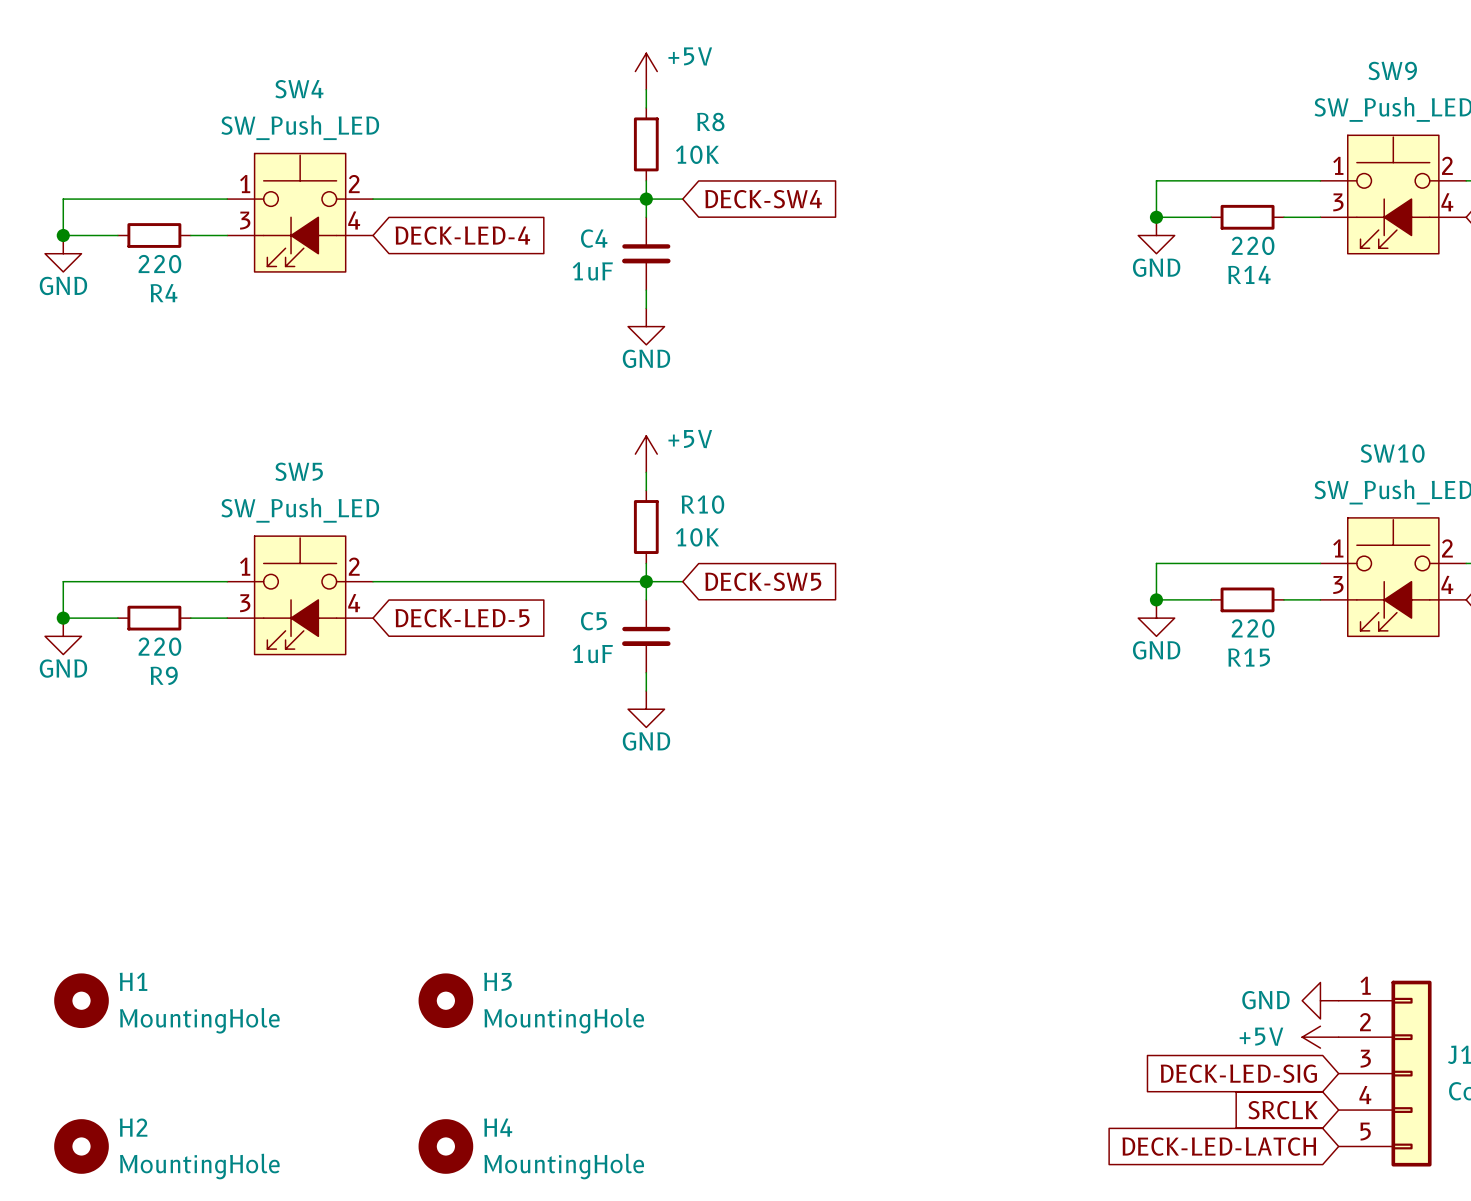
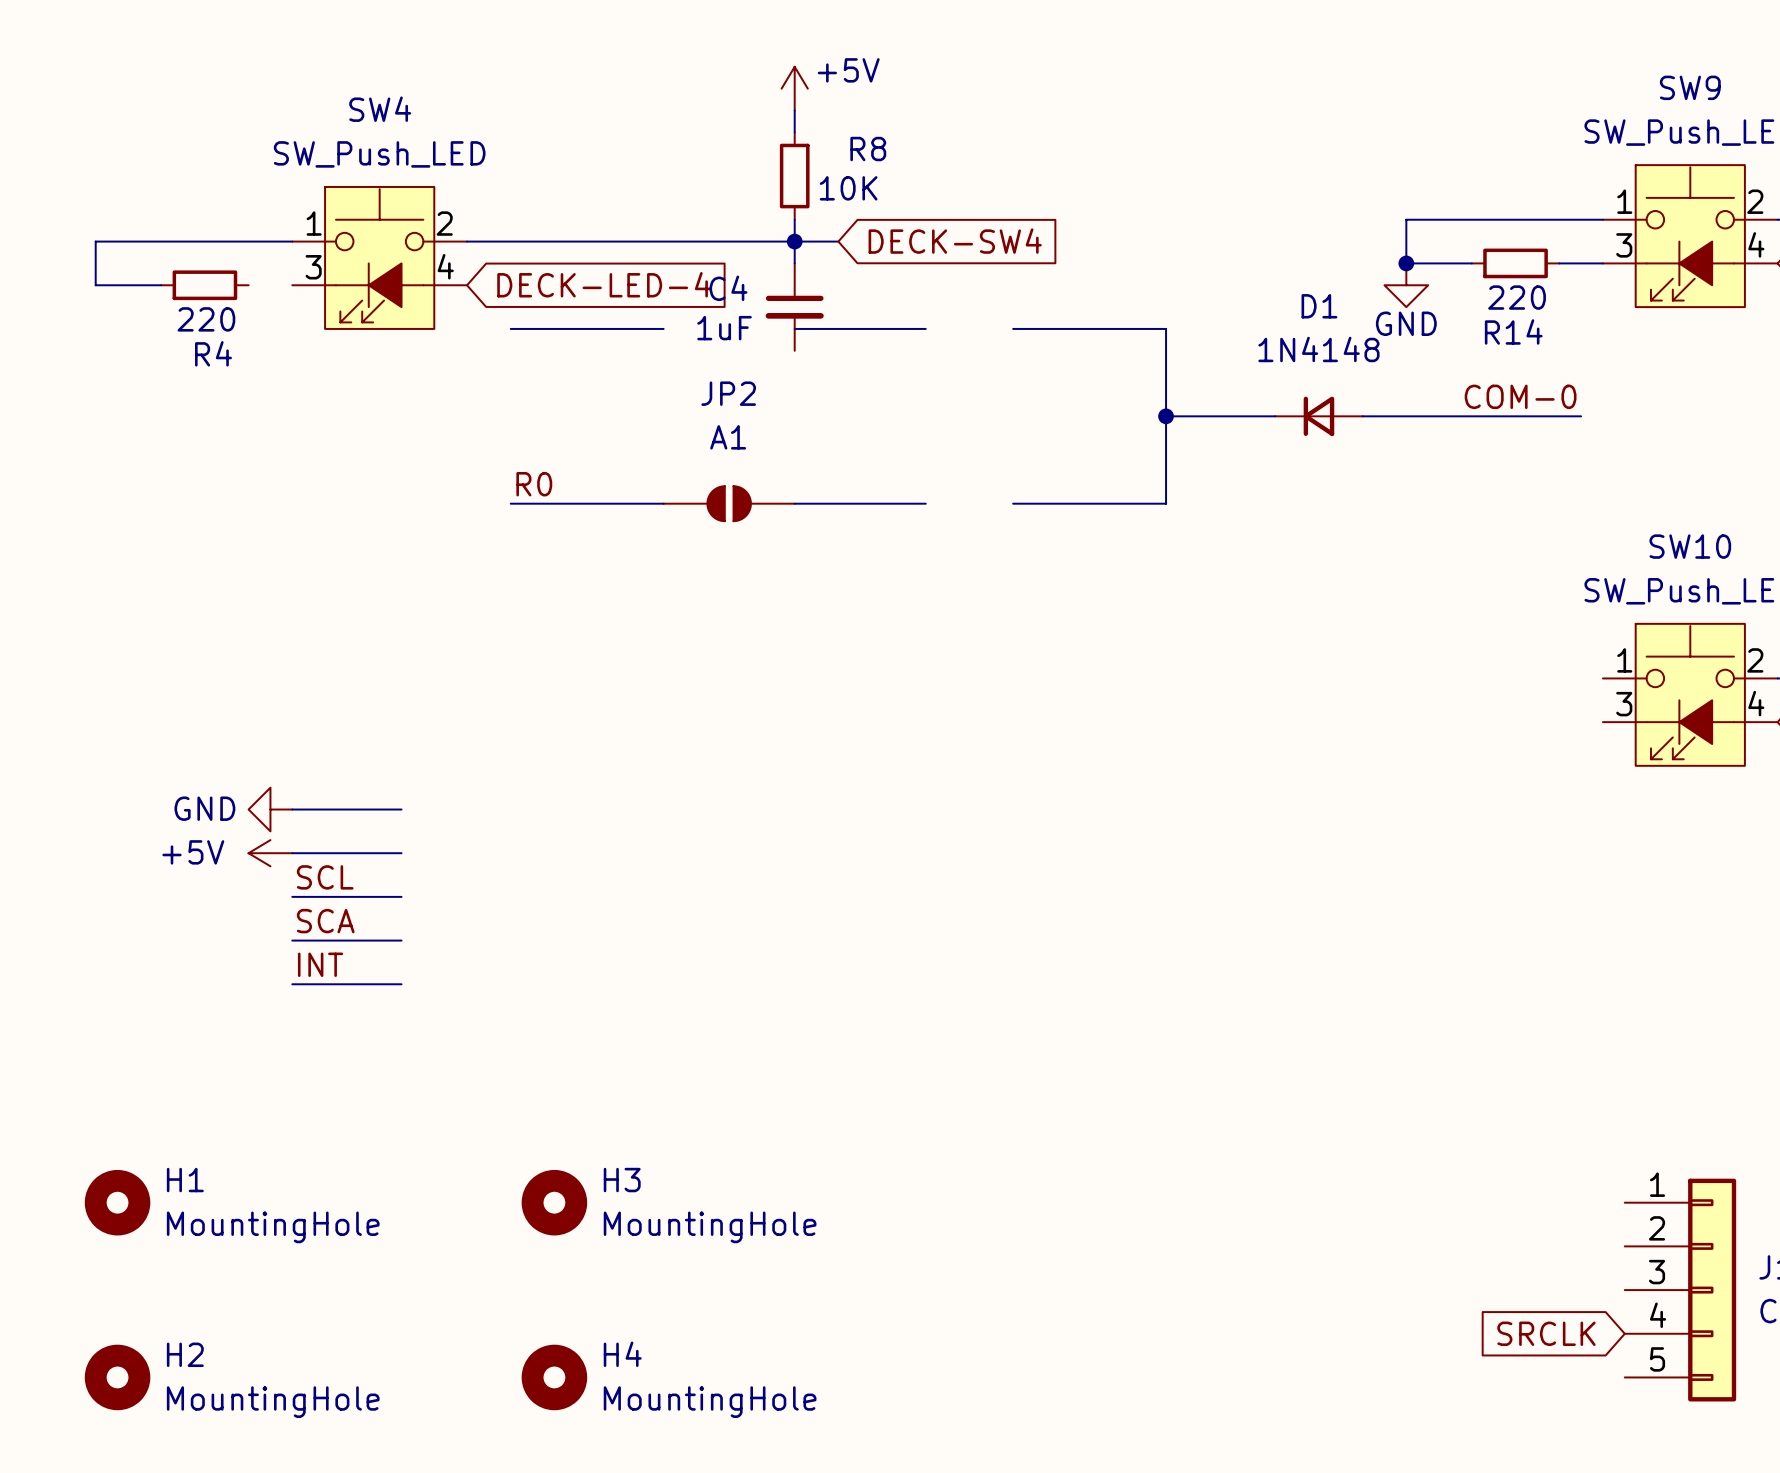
junction: (63, 235) -> none
wire: (190, 235) (227, 235) -> none
power symbol: GND (63, 253) -> none
wire: none -> (510, 328) (663, 328)
wire: none -> (794, 328) (925, 328)
wire: none -> (1013, 328) (1166, 328) (1166, 503) (1013, 503)
wire: (646, 290) (646, 308) -> none
power symbol: GND (646, 326) -> none
label: none -> COM-0 (1520, 396)
wire: none -> (1166, 416) (1275, 416)
junction: none -> (1166, 416)
D1: none -> 1N4148 (1318, 416)
wire: none -> (1362, 416) (1581, 416)
label: none -> R0 (534, 484)
wire: none -> (510, 503) (663, 503)
JP2: none -> A1 (729, 503)
wire: none -> (794, 503) (925, 503)
power symbol: +5V (646, 454) -> none
wire: (646, 472) (646, 490) -> none
R10: 10K (646, 527) -> none
wire: (646, 563) (646, 599) -> none
wire: (1320, 563) (1156, 563) (1156, 599) (1211, 599) -> none
wire: (227, 581) (63, 581) (63, 618) (117, 618) -> none
wire: (373, 581) (682, 581) -> none
junction: (646, 581) -> none
global label: DECK-SW5 (763, 581) -> none
SW5: SW_Push_LED (300, 595) -> none
junction: (1156, 599) -> none
R15: 220 (1247, 599) -> none
wire: (1283, 599) (1320, 599) -> none
junction: (63, 618) -> none
R9: 220 (154, 618) -> none
wire: (190, 618) (227, 618) -> none
global label: DECK-LED-5 (462, 618) -> none
power symbol: GND (1156, 618) -> none
power symbol rotation: 0° (63, 636) -> 90° clockwise (270, 809)
power symbol position: GND (63, 636) -> GND (270, 809)
C5: 1uF (646, 636) -> none
wire: none -> (292, 809) (401, 809)
wire: (646, 672) (646, 690) -> none
power symbol: none -> +5V (270, 853)
wire: none -> (292, 853) (401, 853)
power symbol: GND (646, 709) -> none
label: none -> SCL (325, 877)
wire: none -> (292, 896) (401, 896)
label: none -> SCA (325, 921)
wire: none -> (292, 940) (401, 940)
label: none -> INT (320, 964)
wire: none -> (292, 984) (401, 984)
power symbol: GND (1320, 1000) -> none
power symbol: +5V (1320, 1037) -> none
global label: DECK-LED-SIG (1238, 1073) -> none
global label: DECK-LED-LATCH (1219, 1146) -> none

